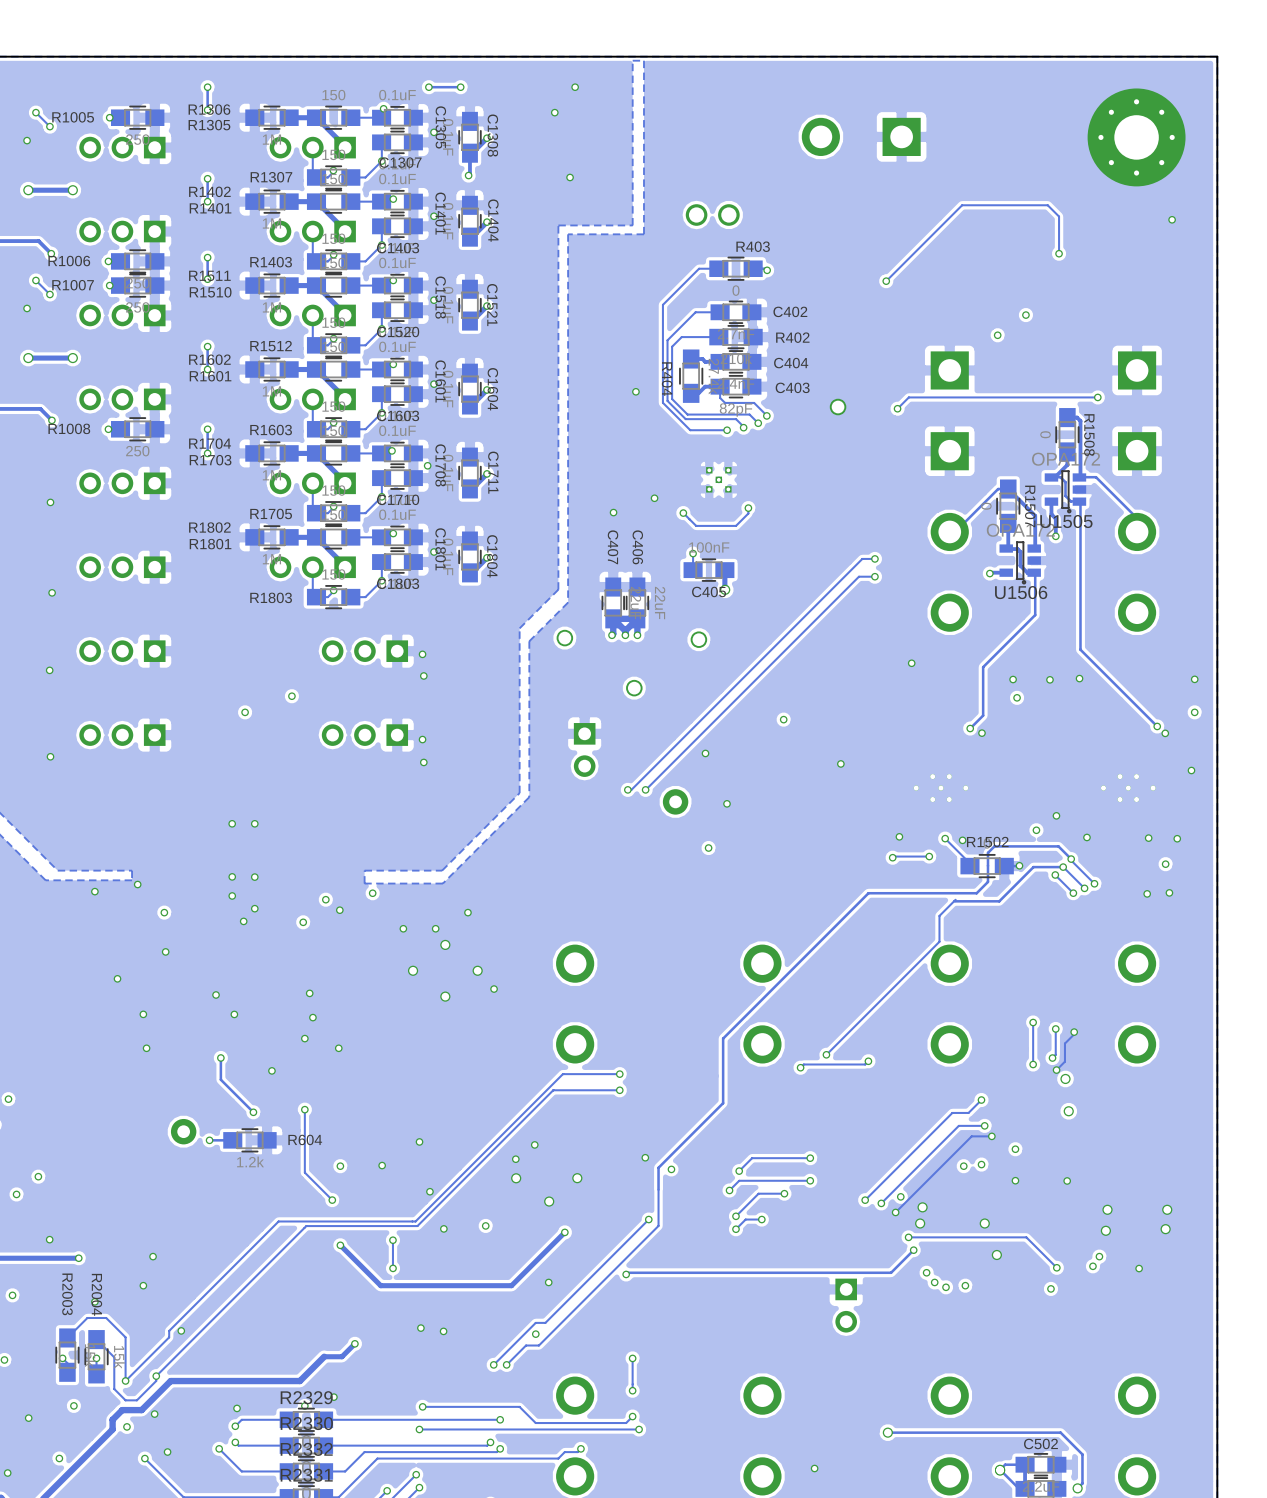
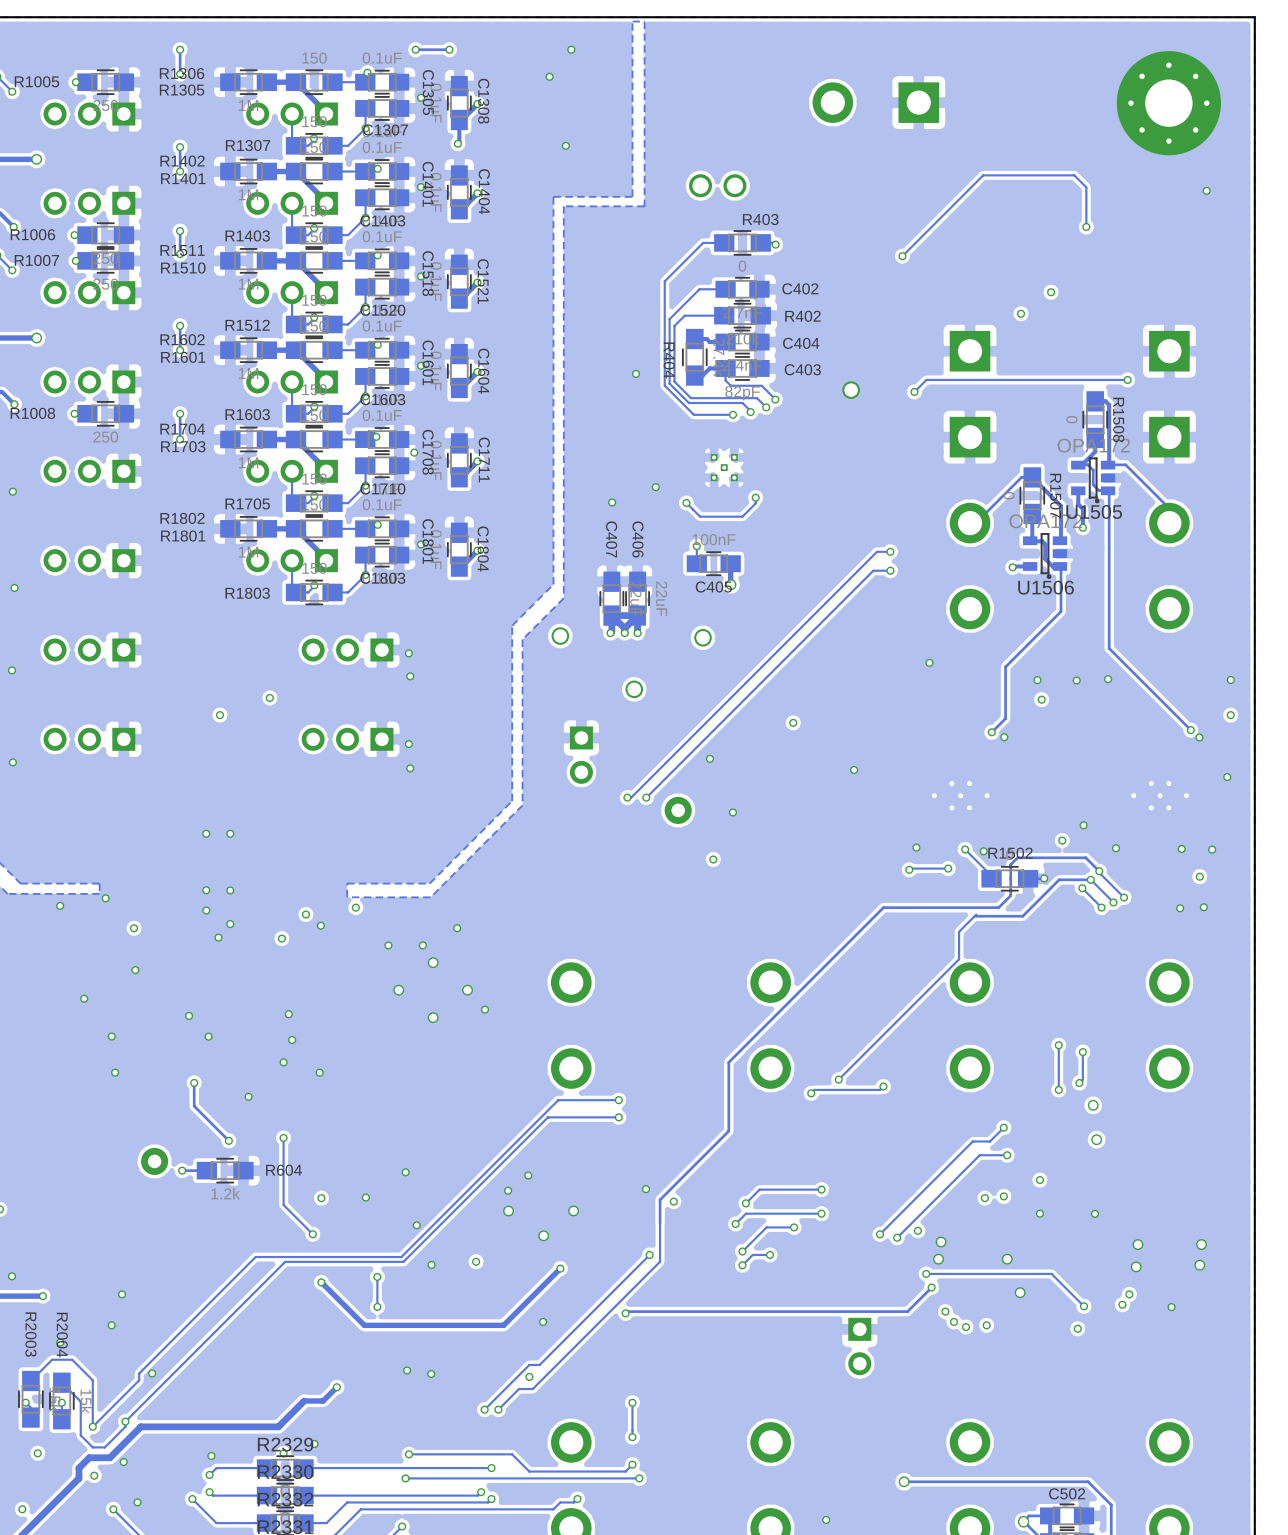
track: (1074, 1032) (1064, 1043) (1064, 1061) (1056, 1070) -> none
via: (1074, 1032) -> none
via: (1056, 1070) -> none
track: (991, 1136) (971, 1136) (895, 1212) -> none
via: (991, 1136) -> none
via: (895, 1212) -> none

